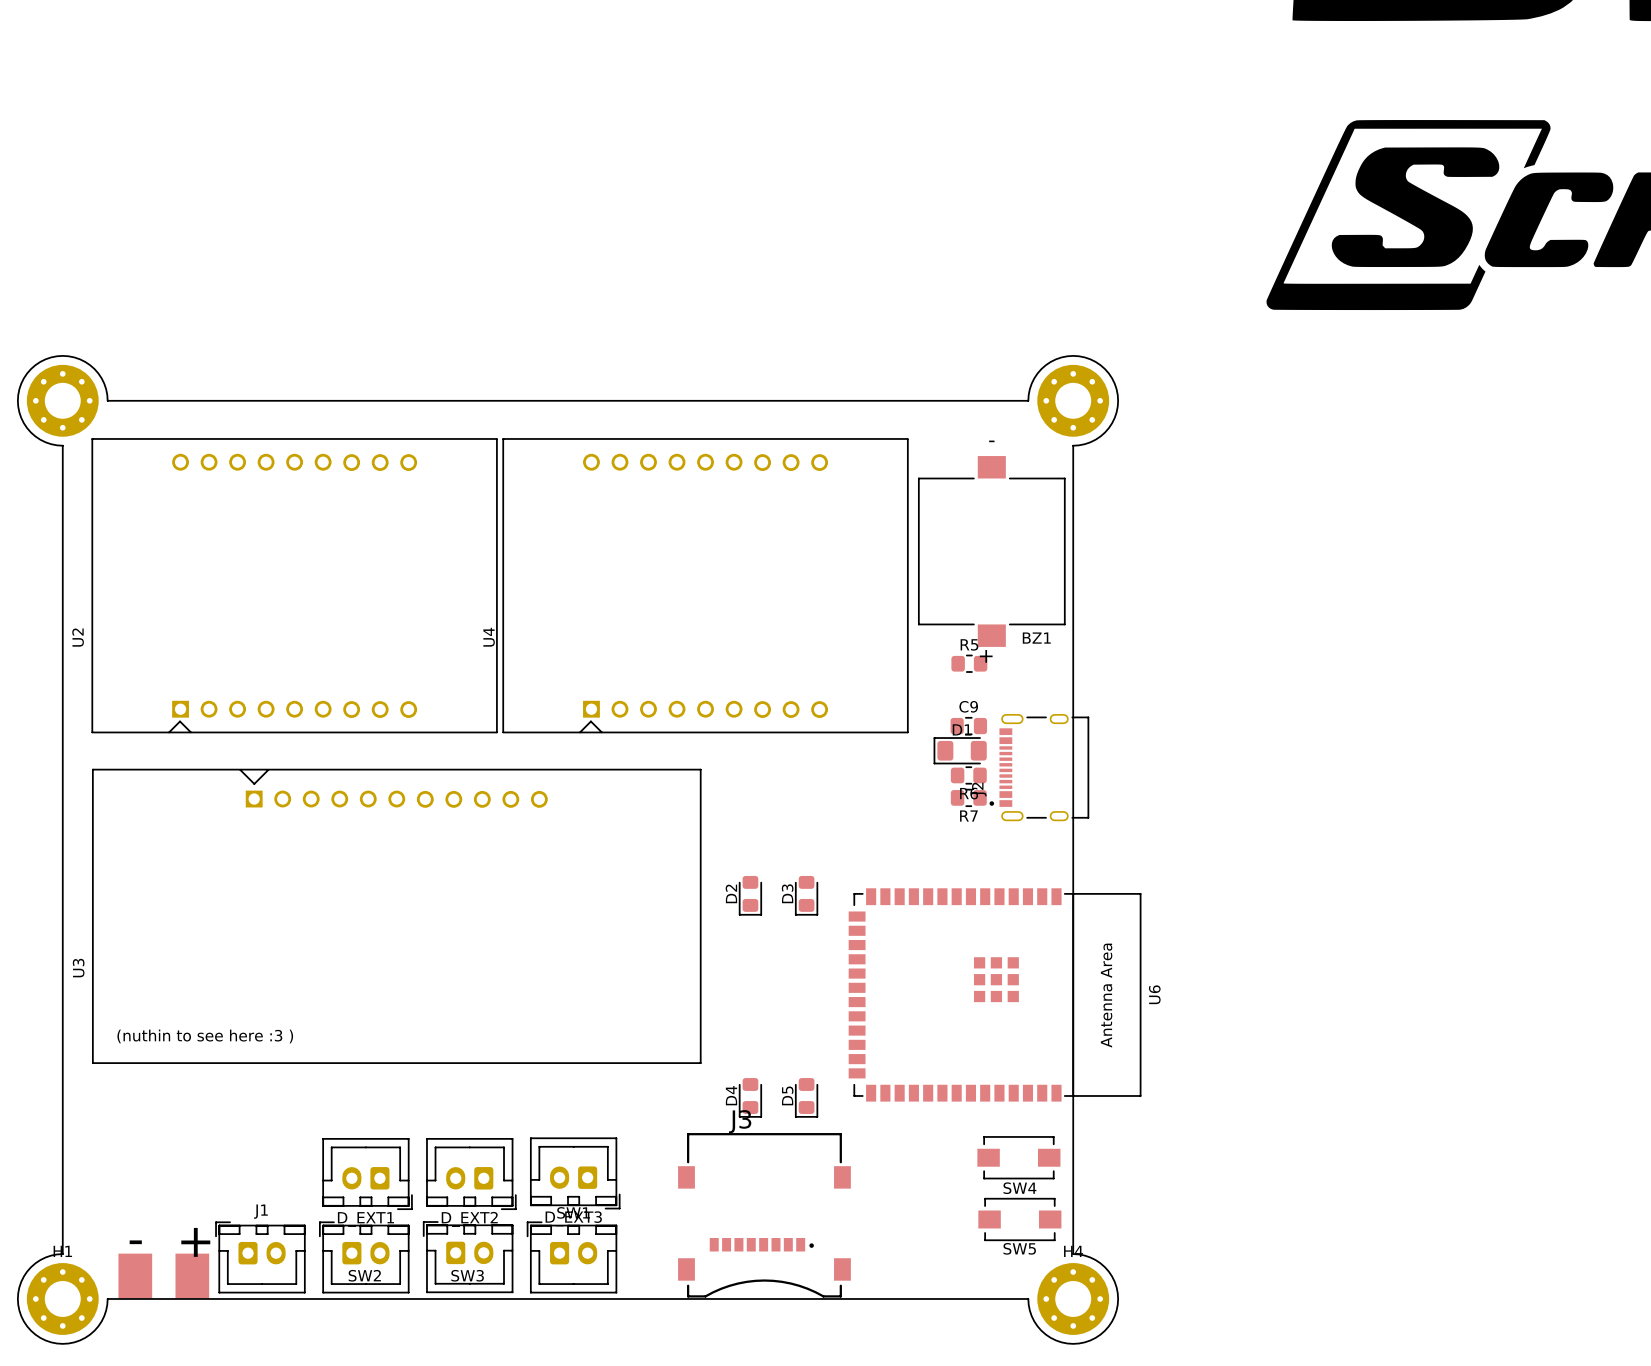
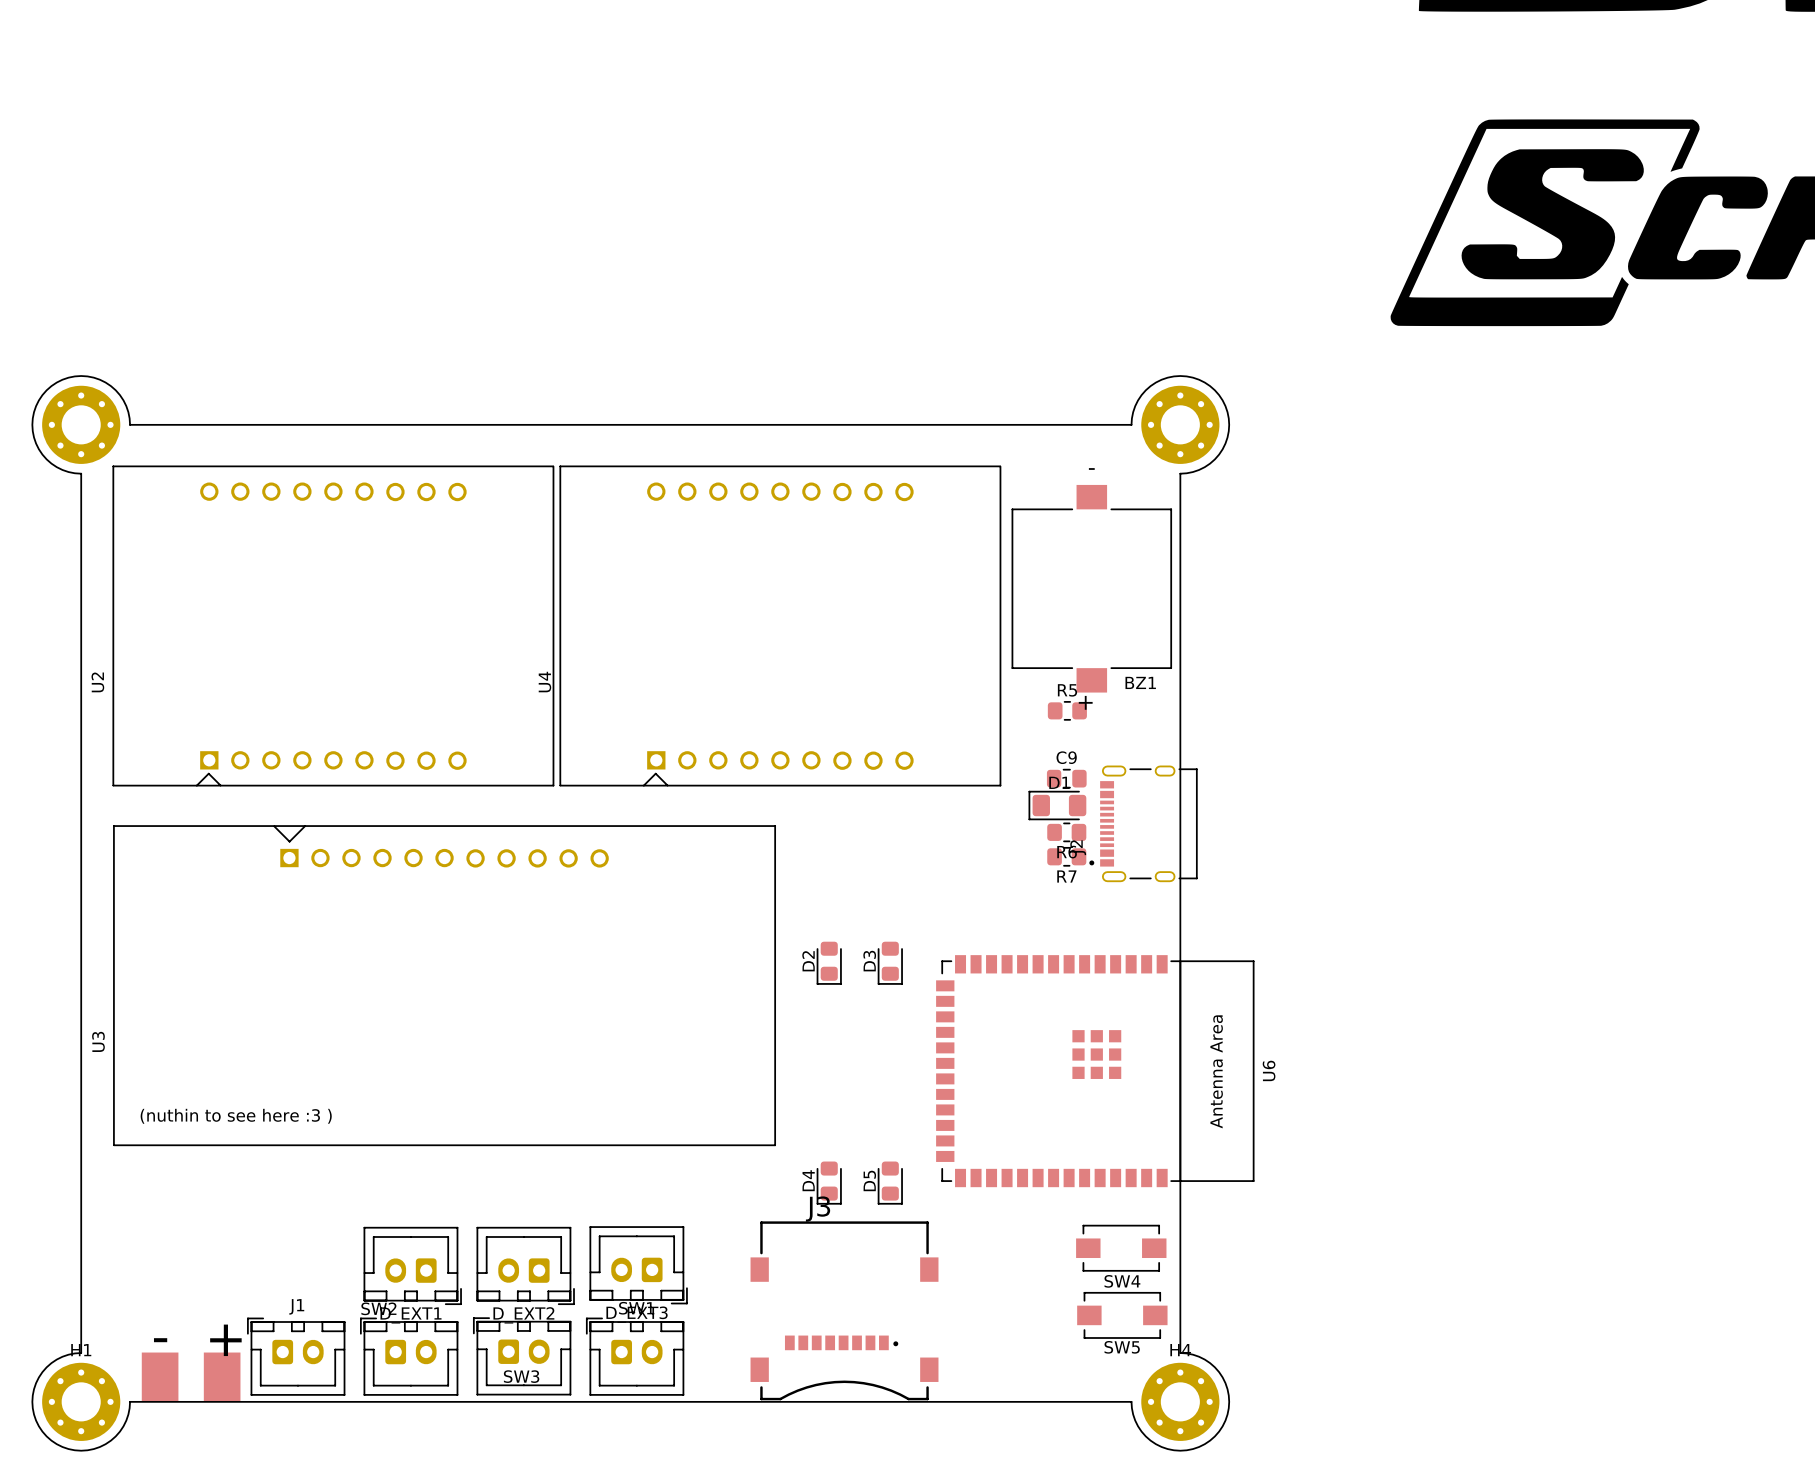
SW2 name position: SW2 (364, 1275) -> SW2 (378, 1308)

